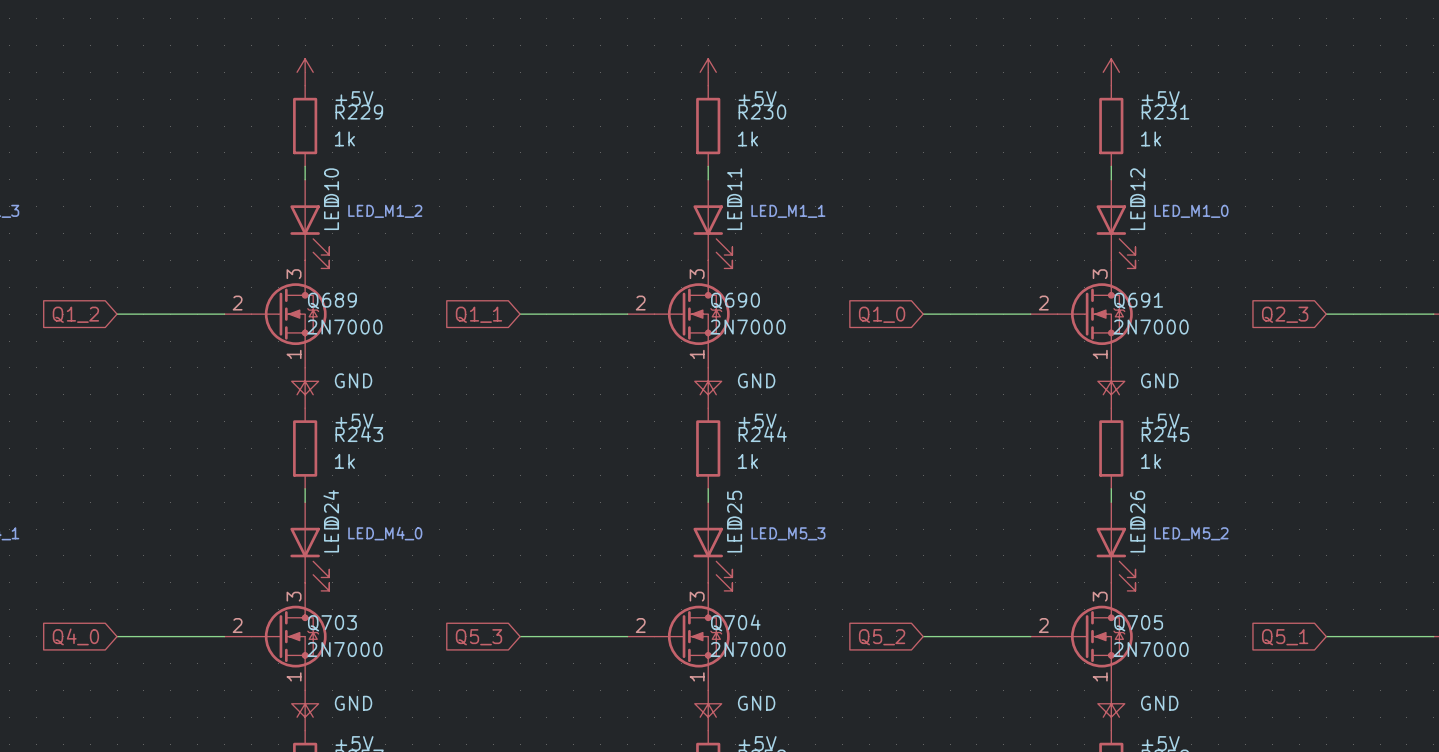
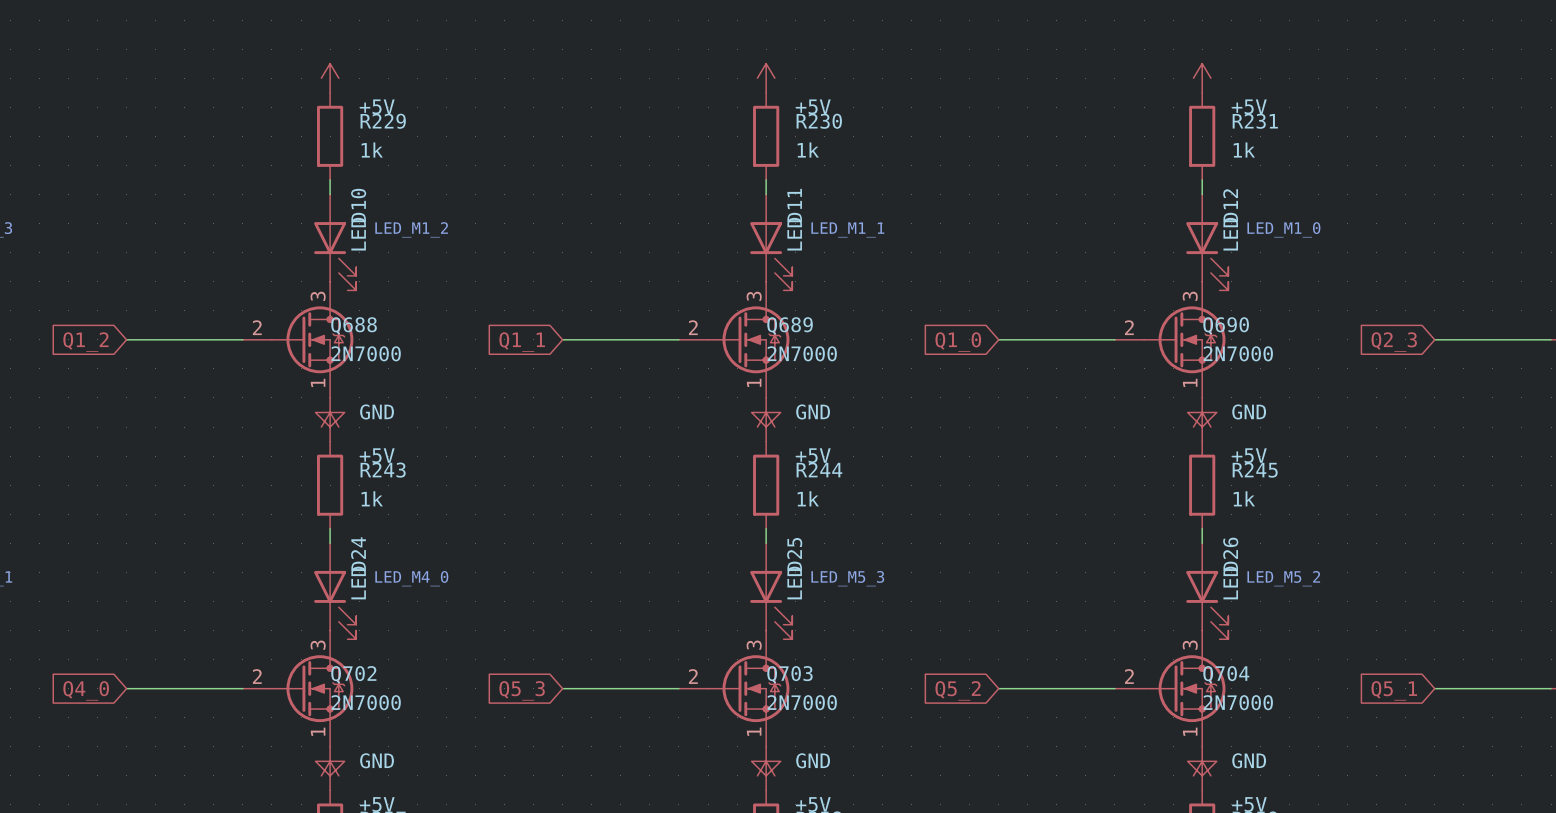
Q689 name: Q689 (332, 300) -> Q688 (354, 325)
Q690 name: Q690 (735, 300) -> Q689 (790, 325)
Q691 name: Q691 (1138, 300) -> Q690 (1226, 325)
Q704 name: Q704 (735, 622) -> Q703 (789, 674)
Q703 name: Q703 (332, 623) -> Q702 (353, 674)
Q705 name: Q705 (1138, 623) -> Q704 (1226, 674)

